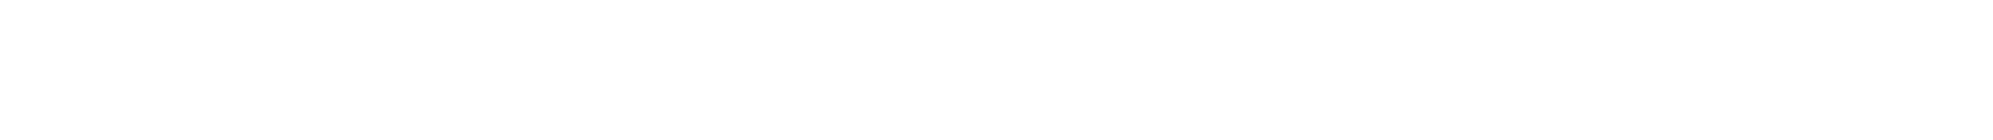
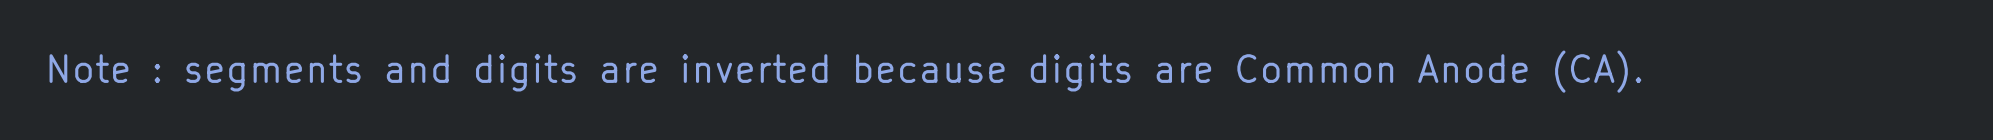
text: none -> Note : segments and digits are inverted because digits are Common Anode (CA). (845, 71)

